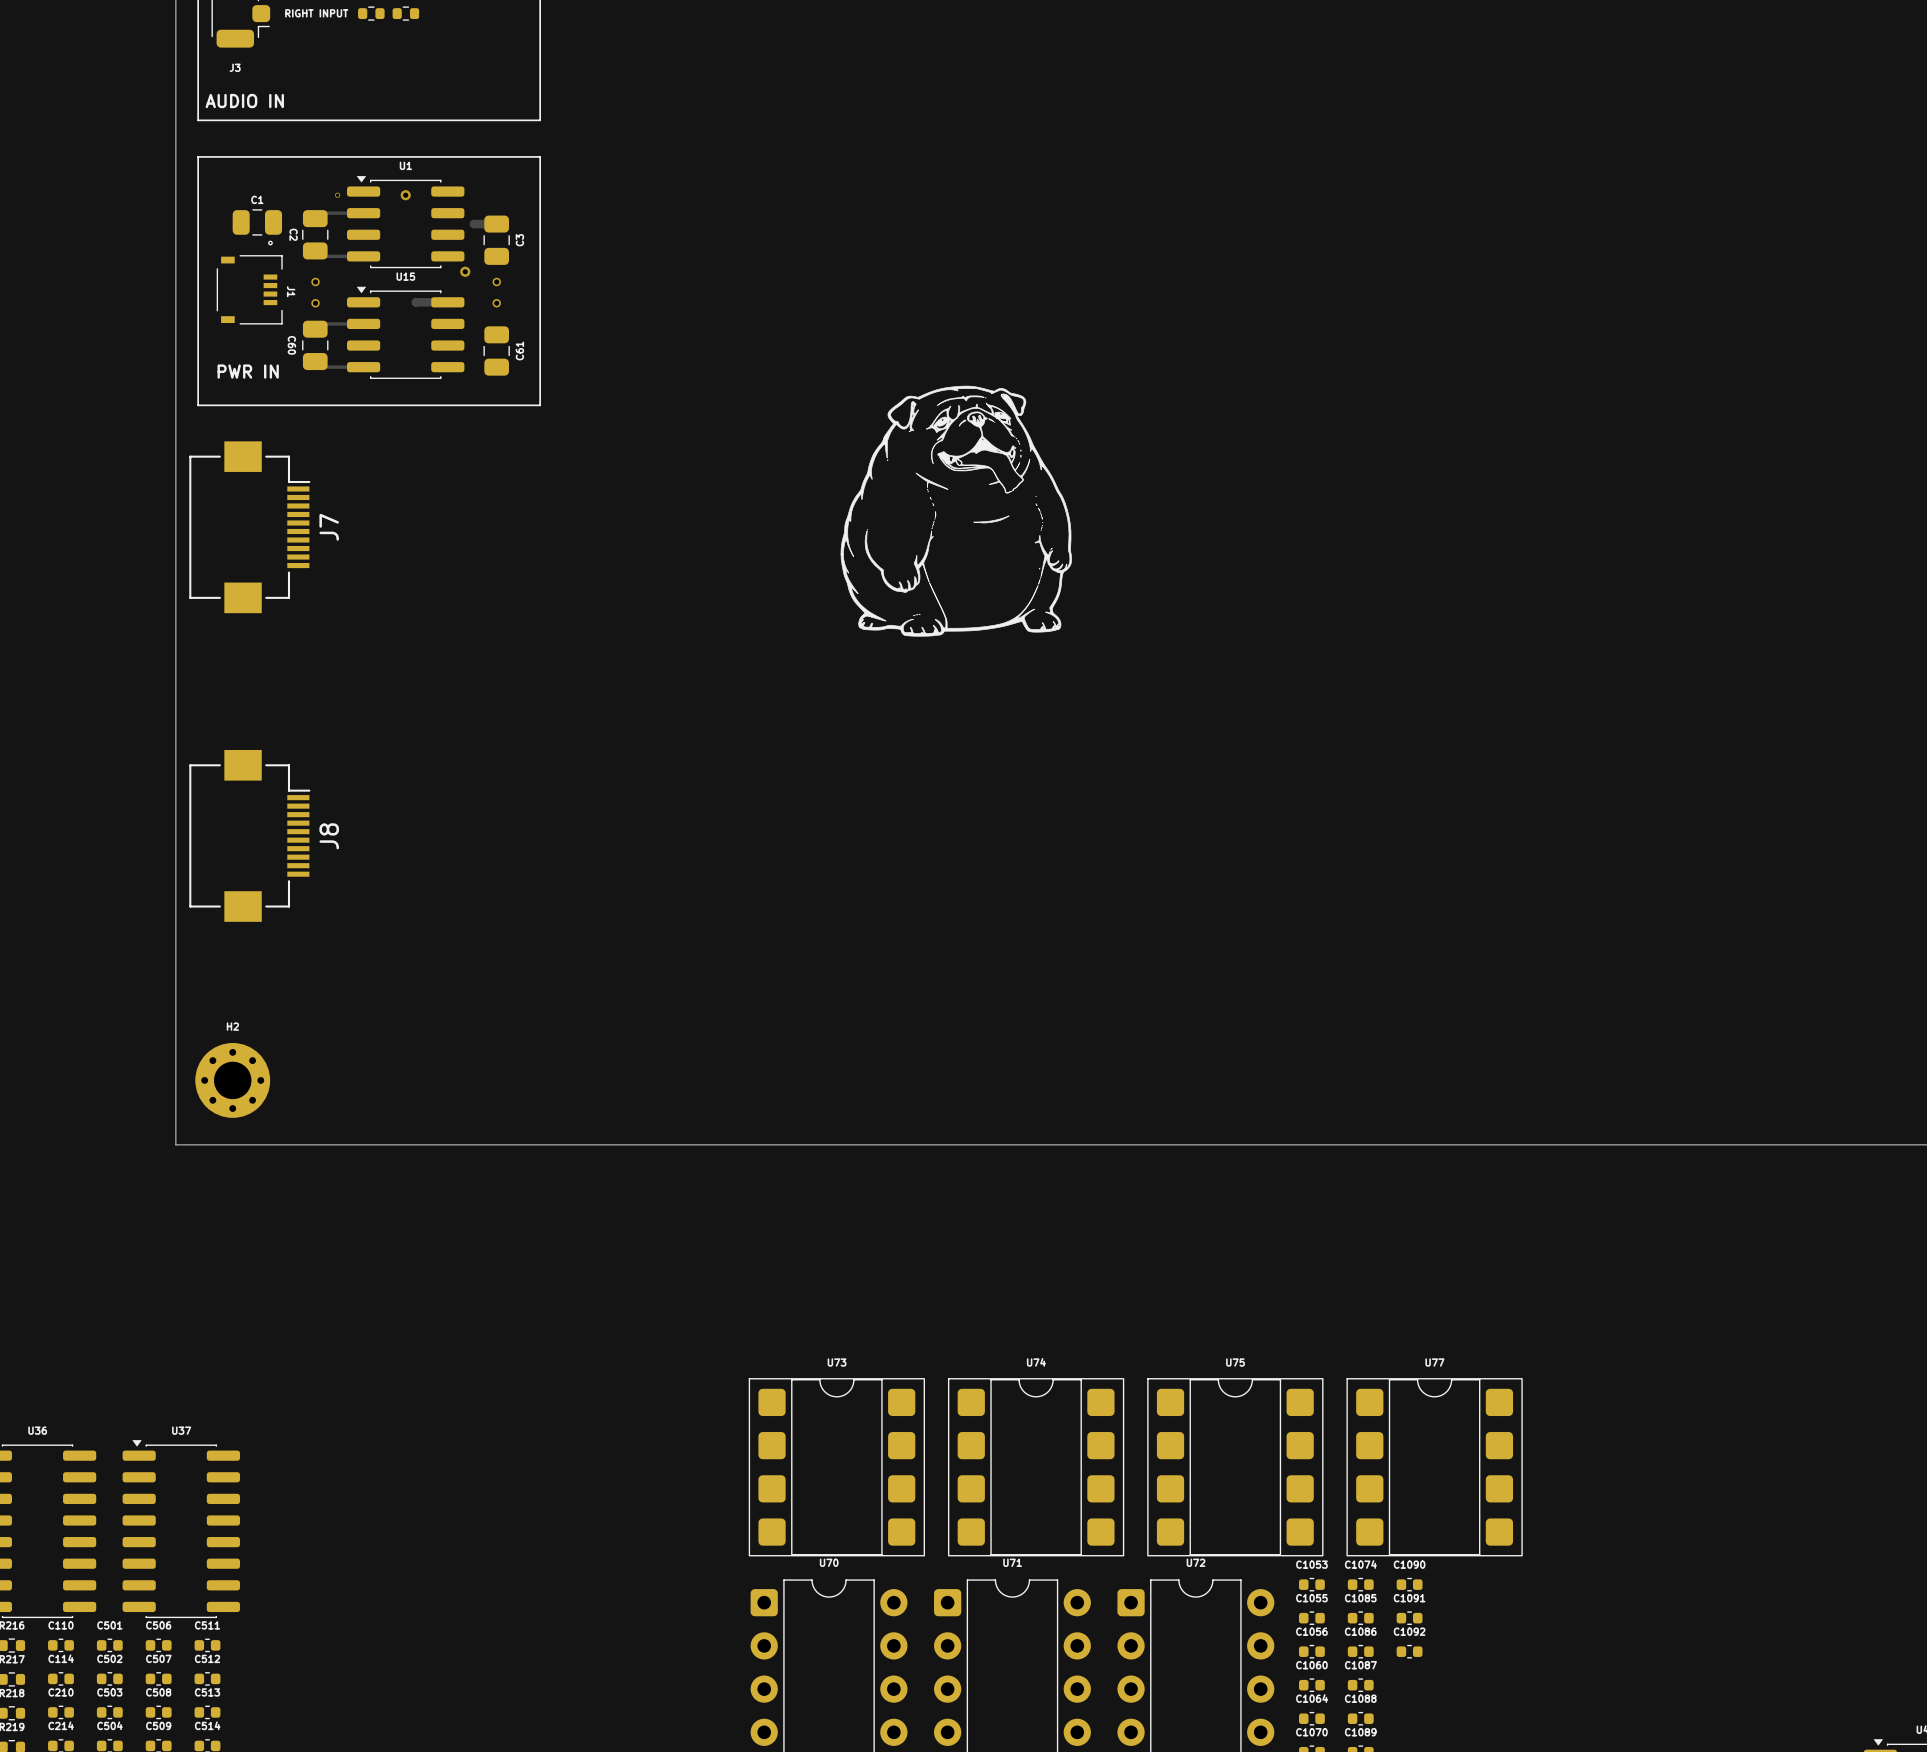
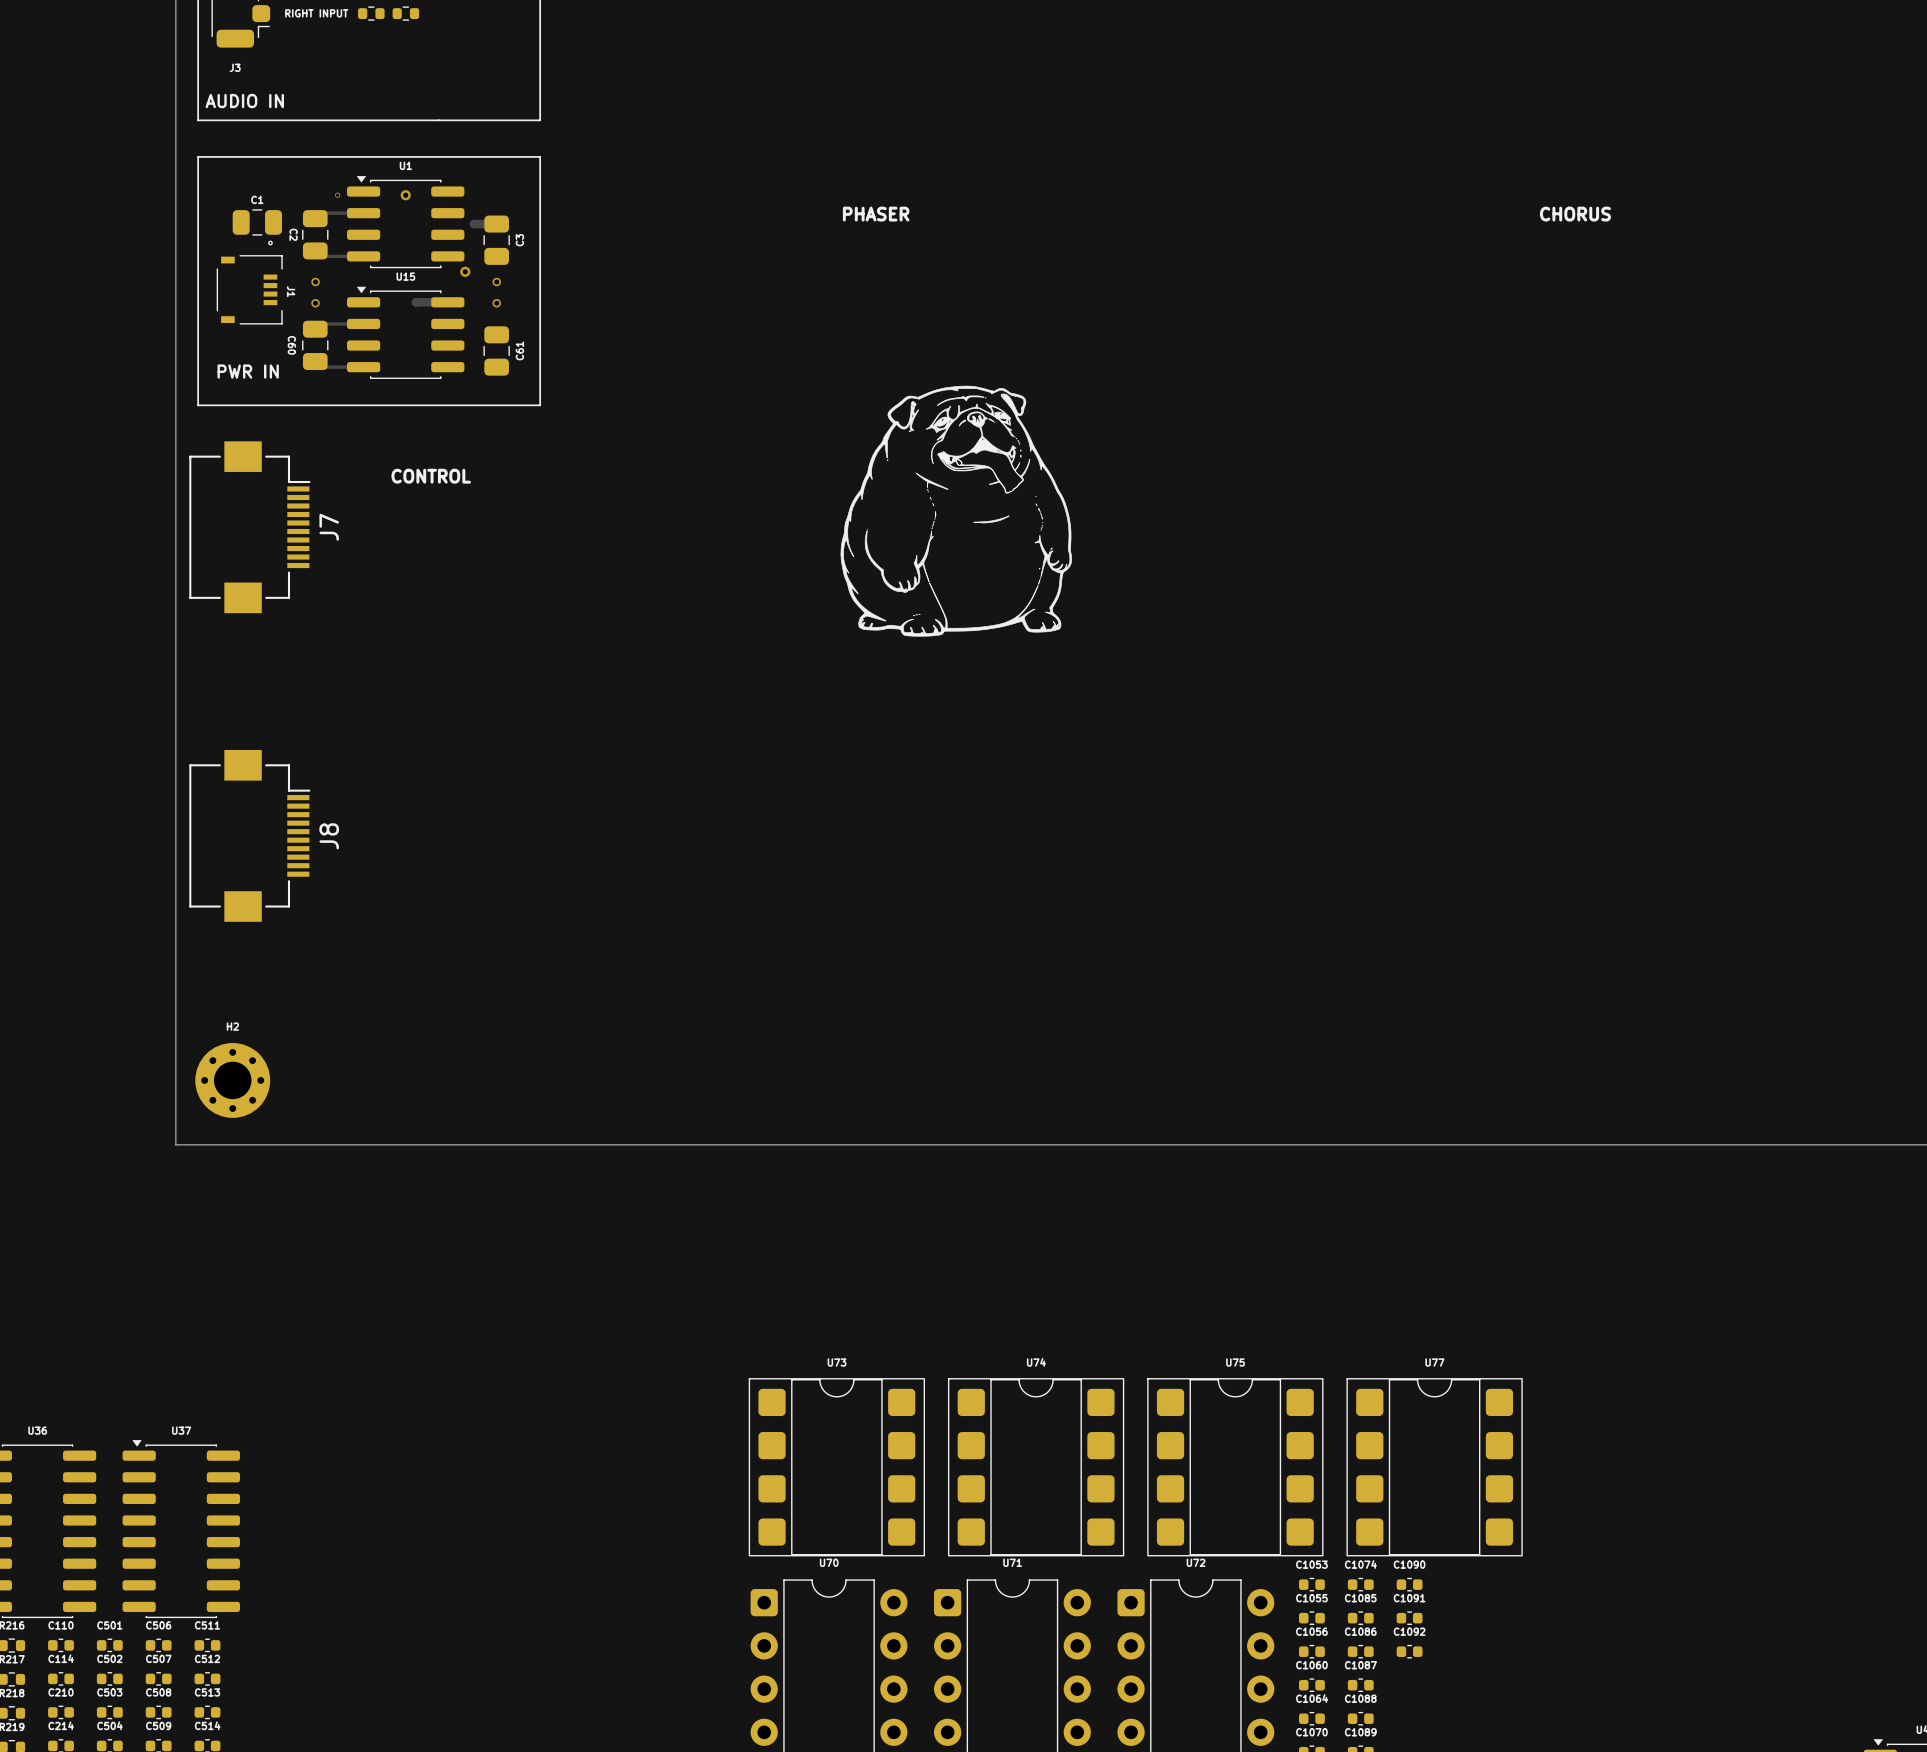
text: none -> PHASER (876, 214)
text: none -> CHORUS (1575, 214)
text: none -> CONTROL (431, 476)

